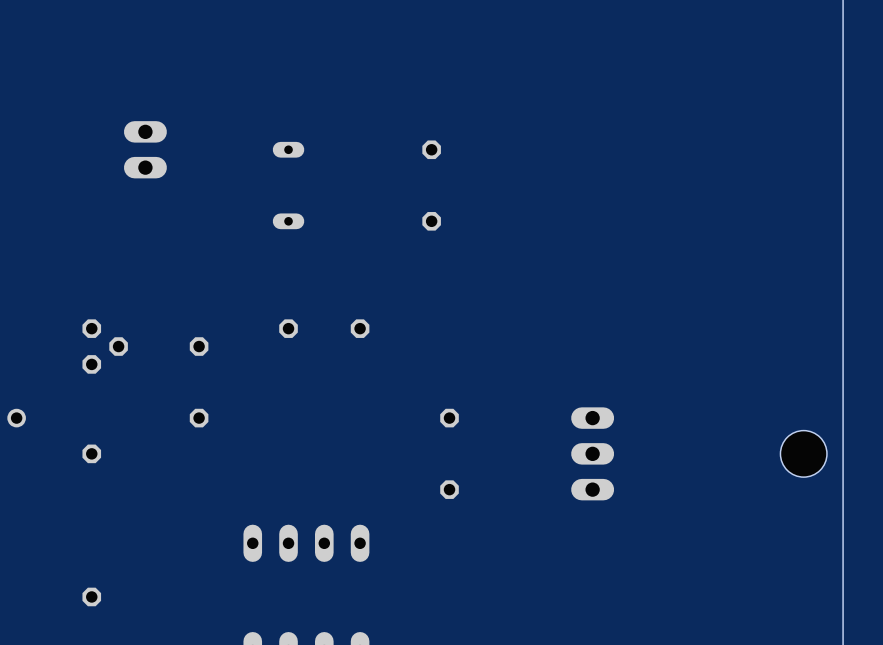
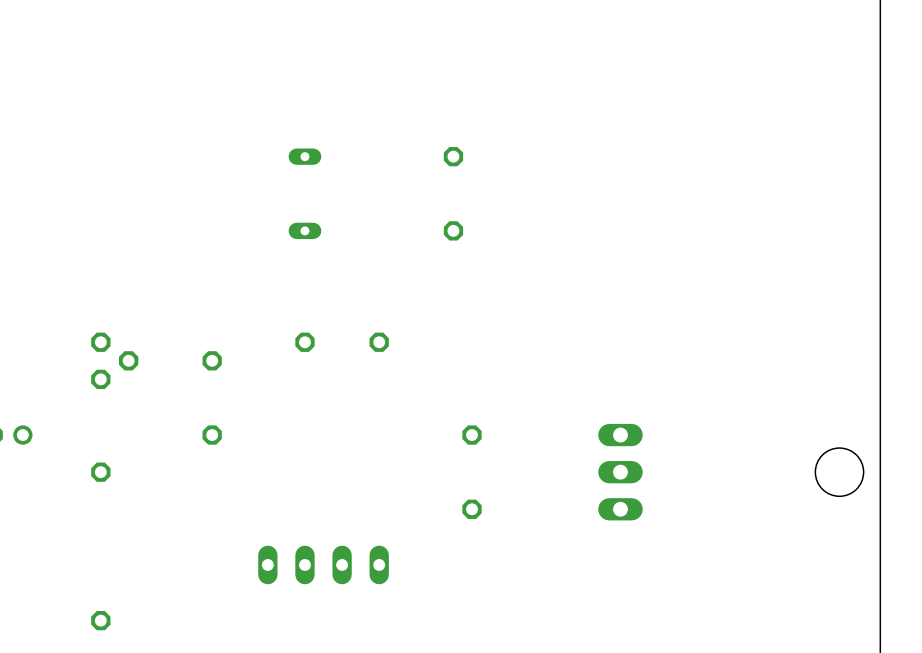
part: (145, 149) -> none

